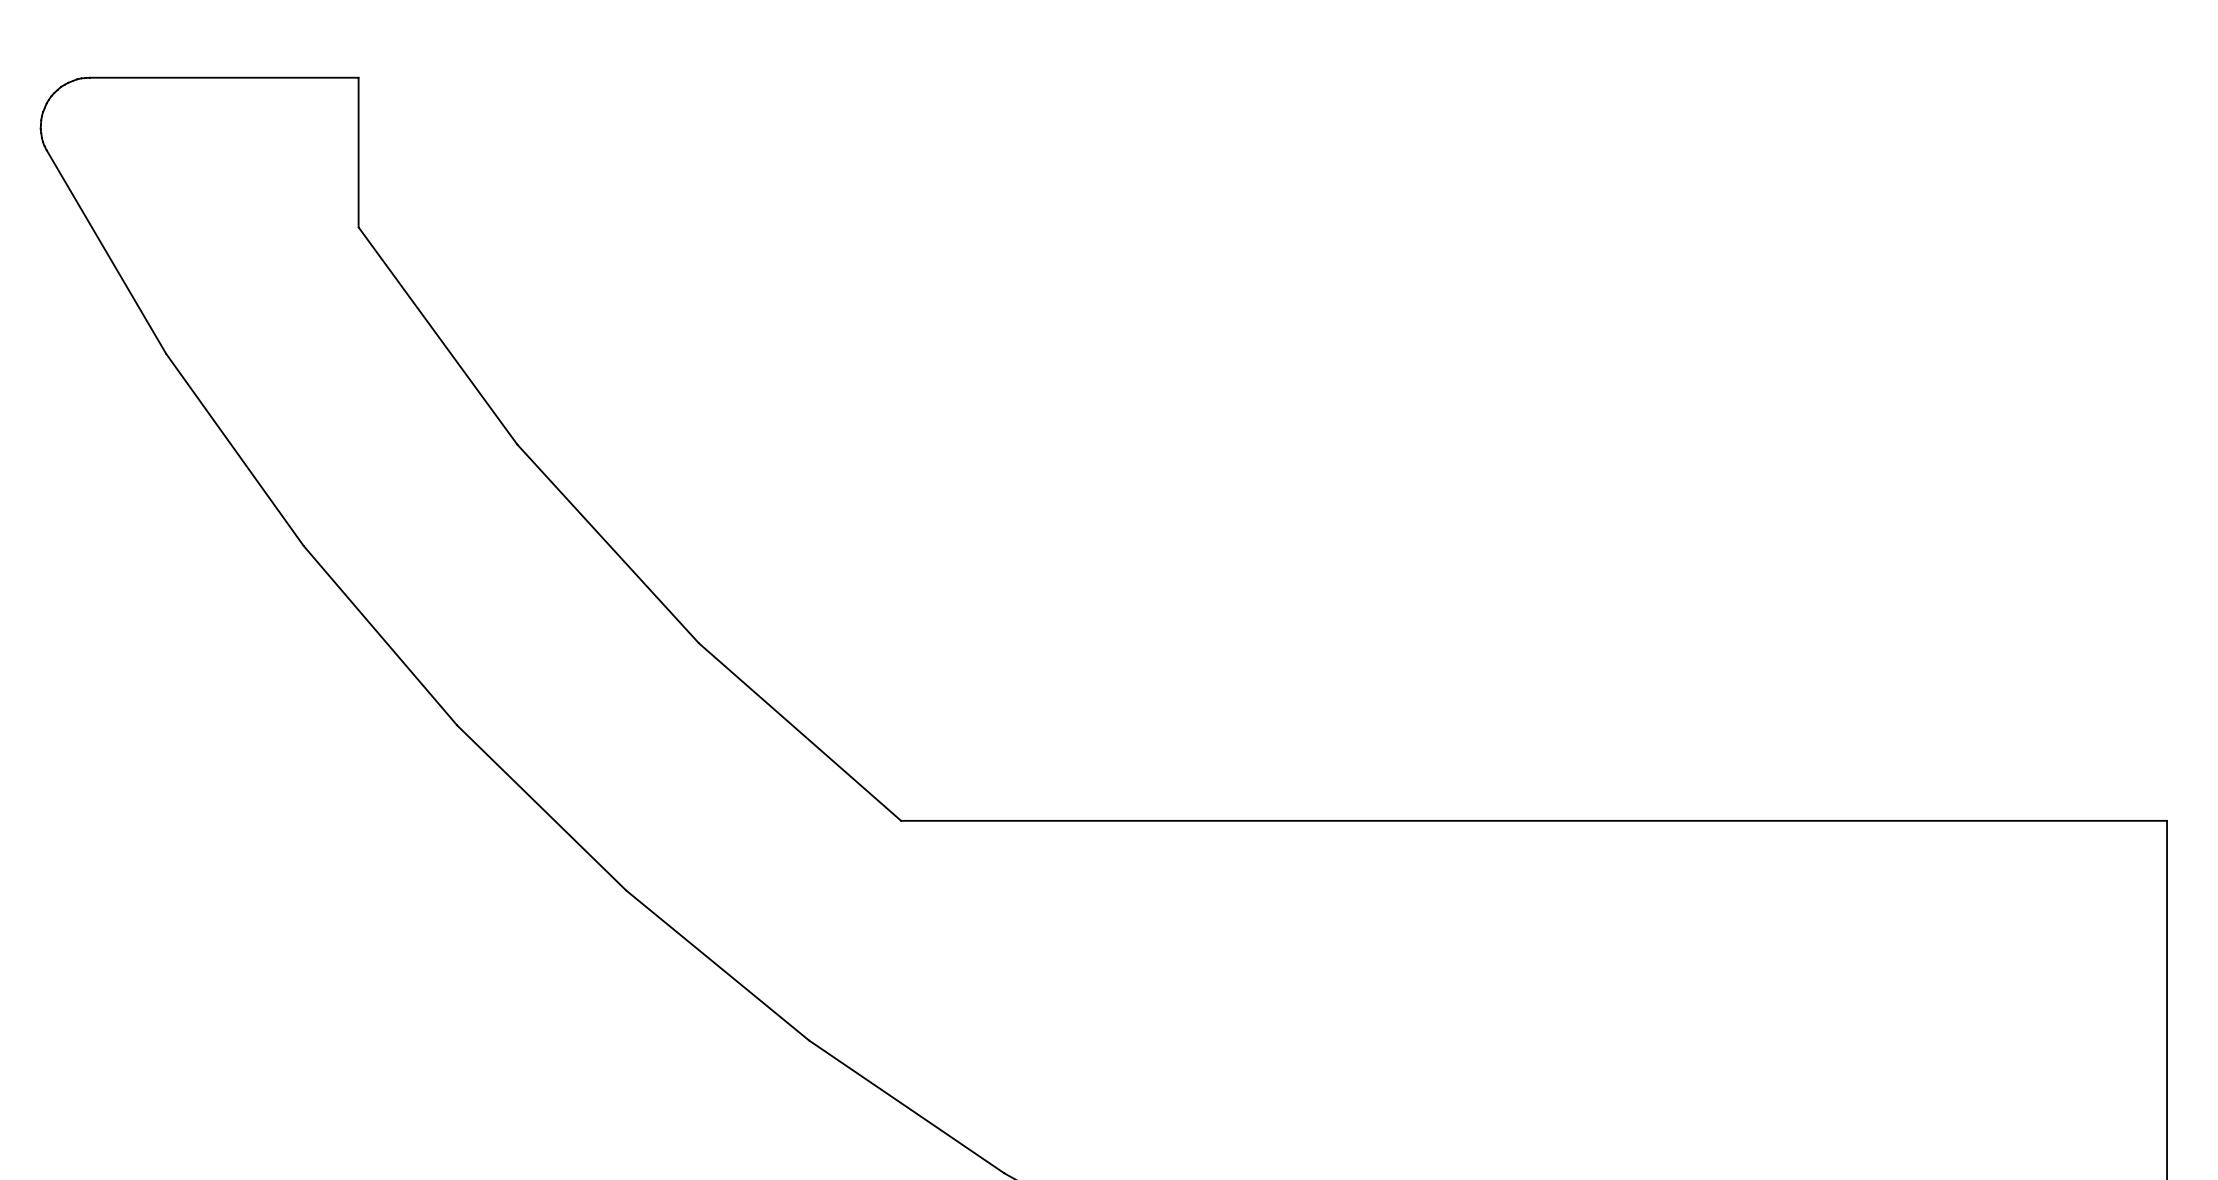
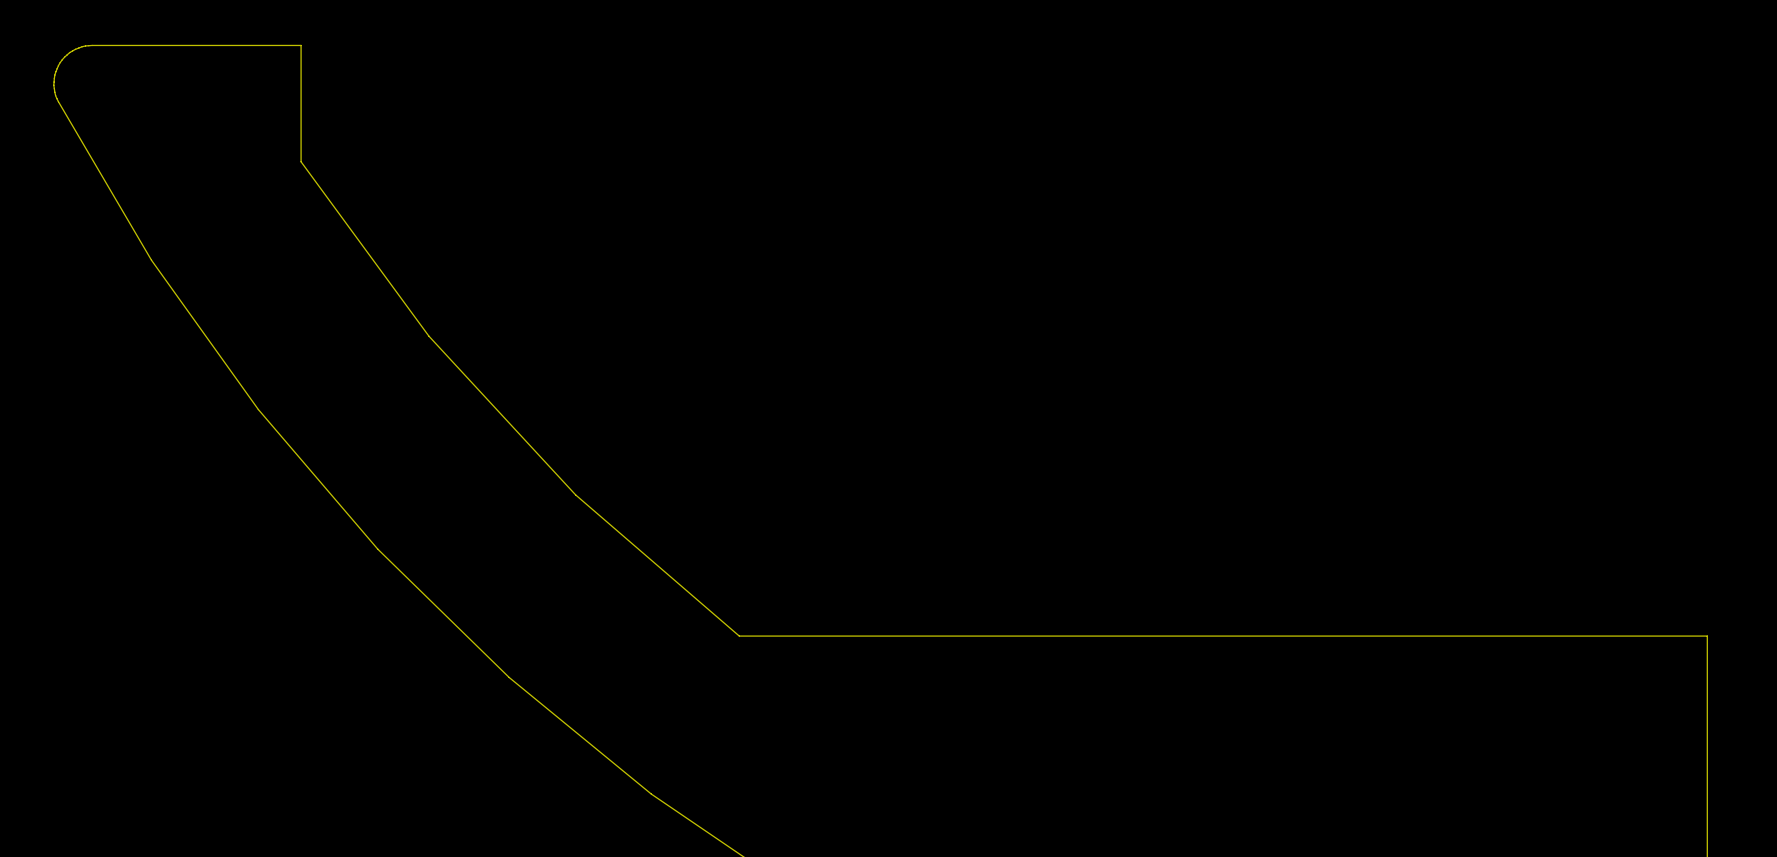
board edge: (358, 227) (517, 444) (698, 643) (901, 820) (2167, 820) (2167, 837) -> (301, 161) (428, 336) (575, 494) (739, 636) (1707, 636)

